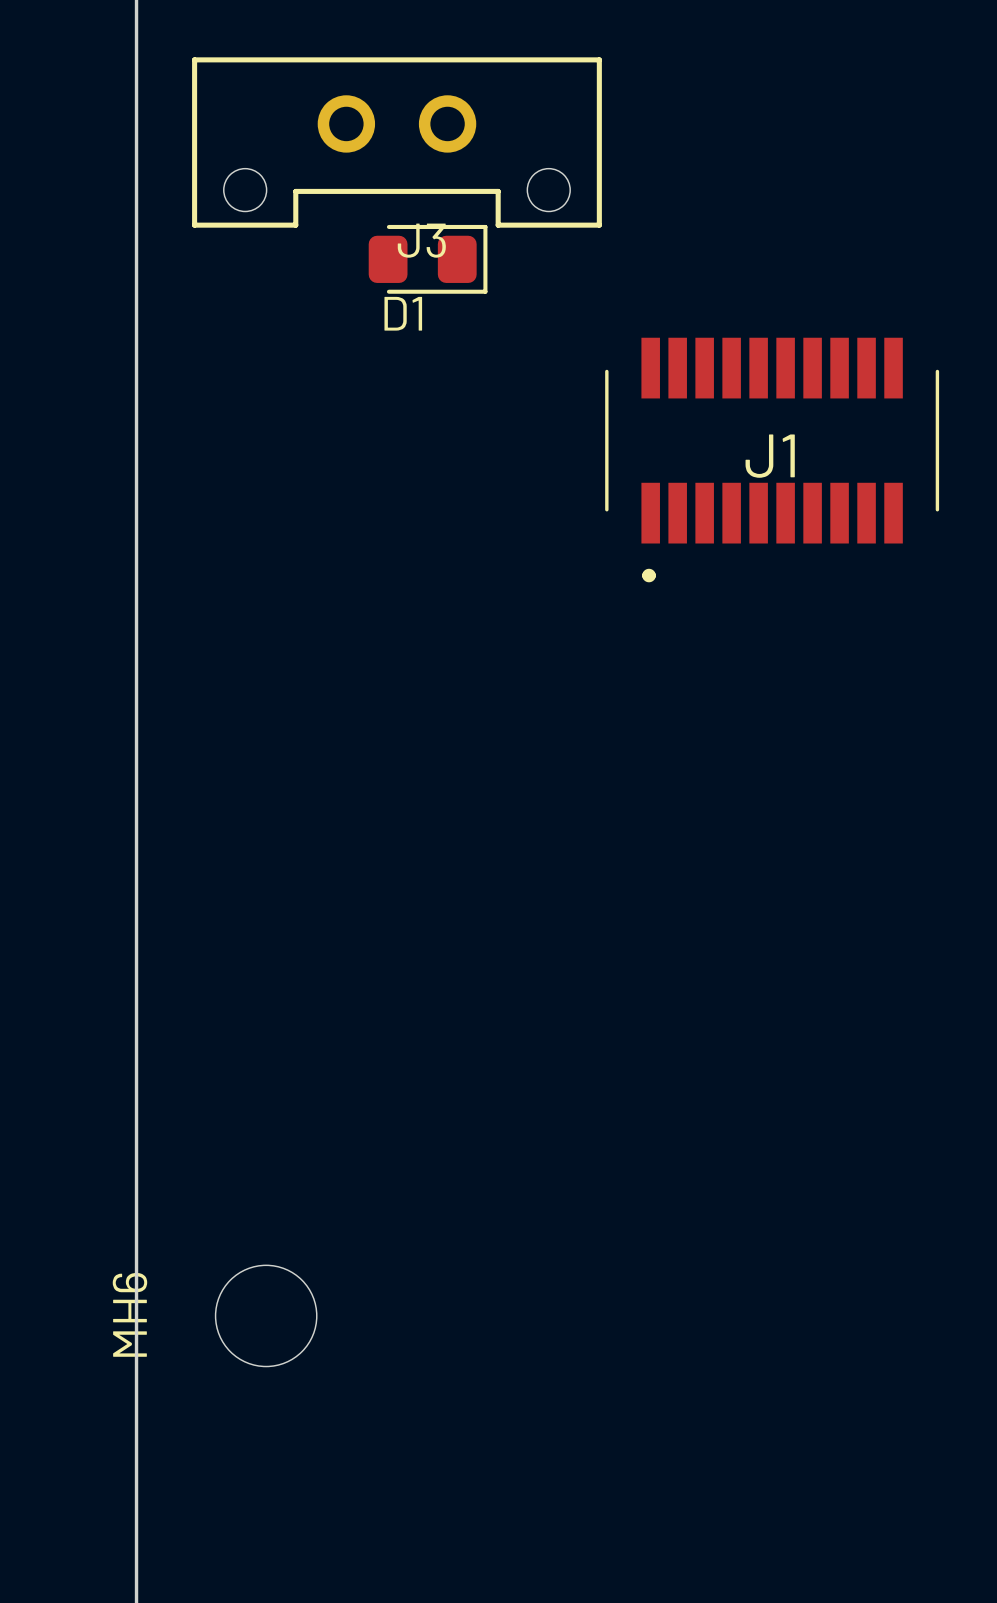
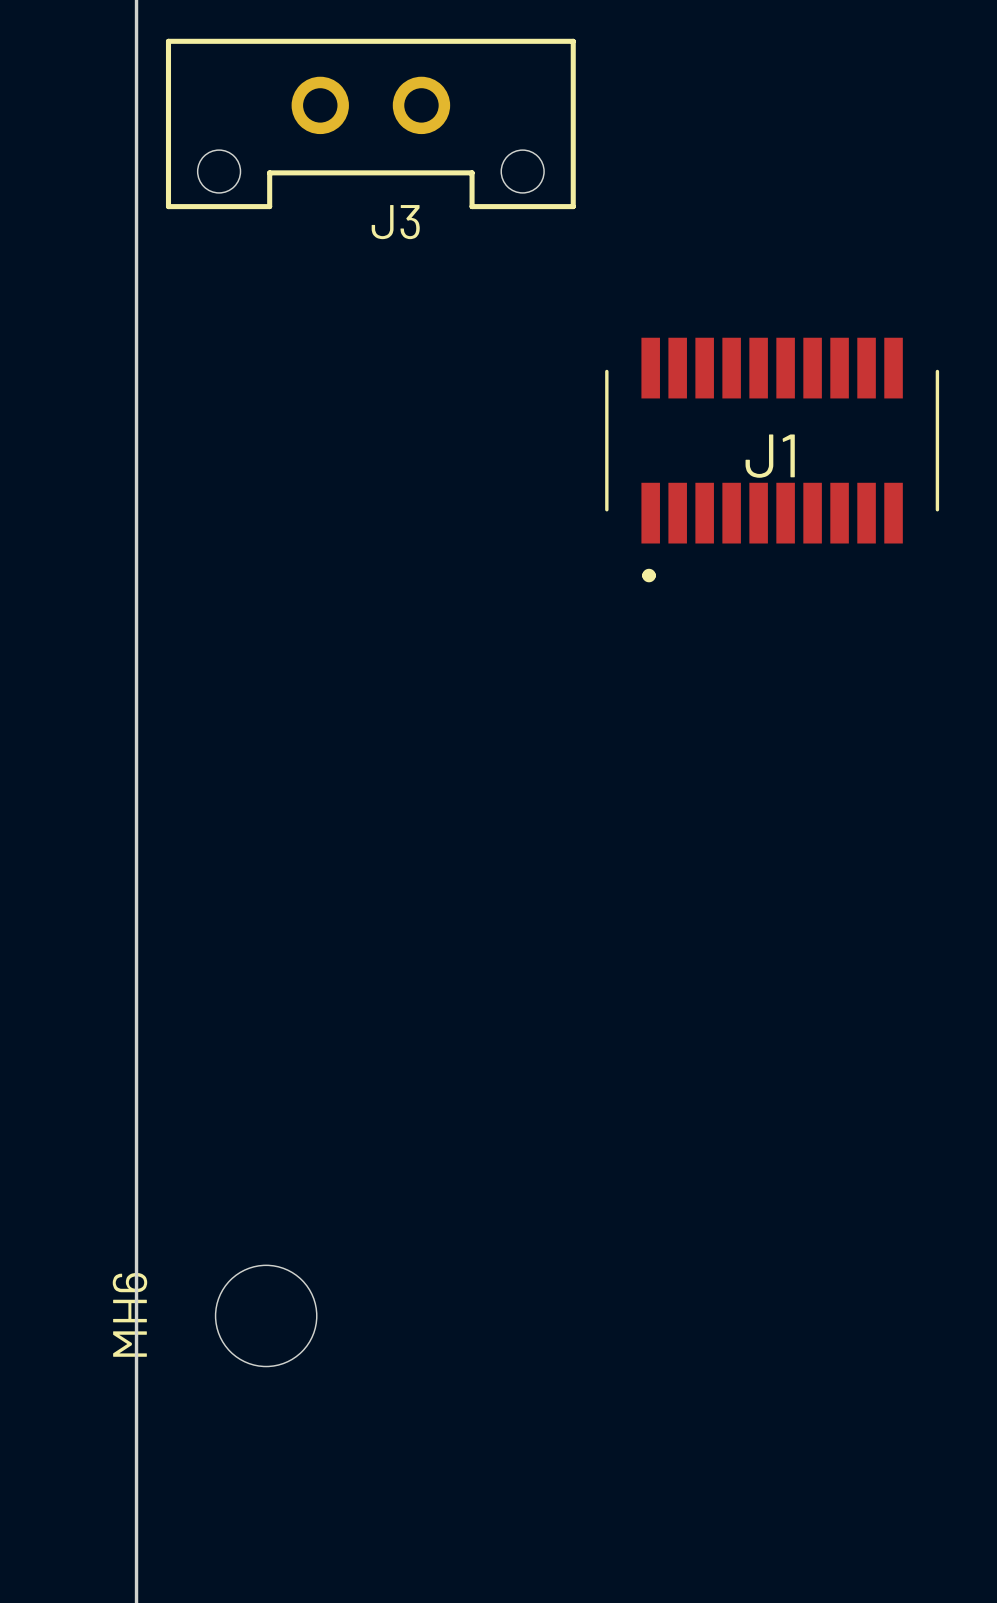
J3 position: (396, 142) -> (370, 123)
D1: (428, 259) -> none

